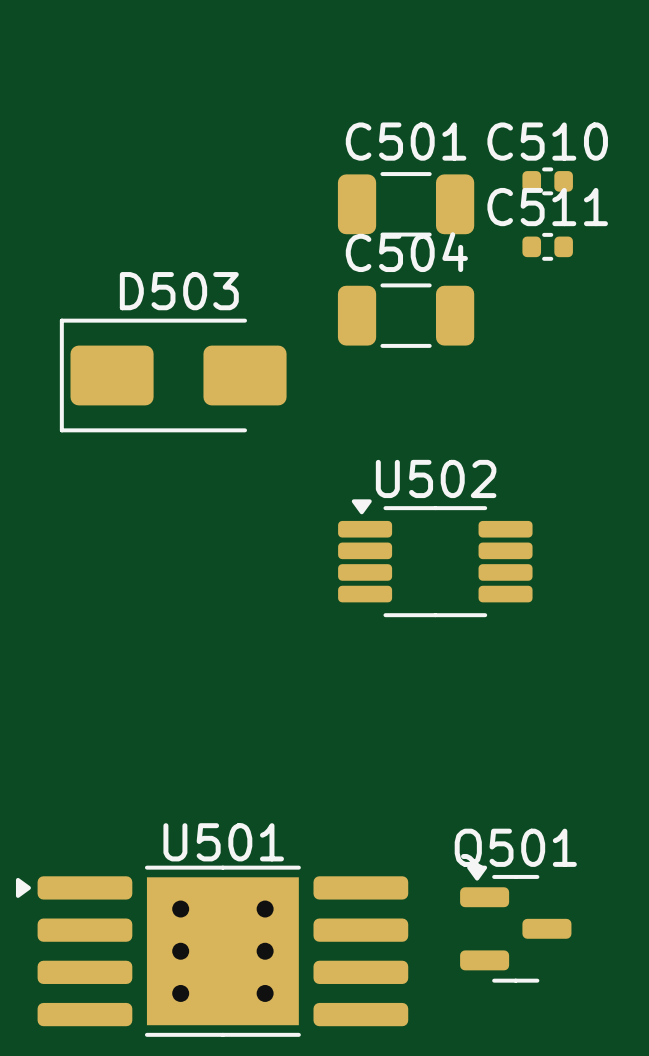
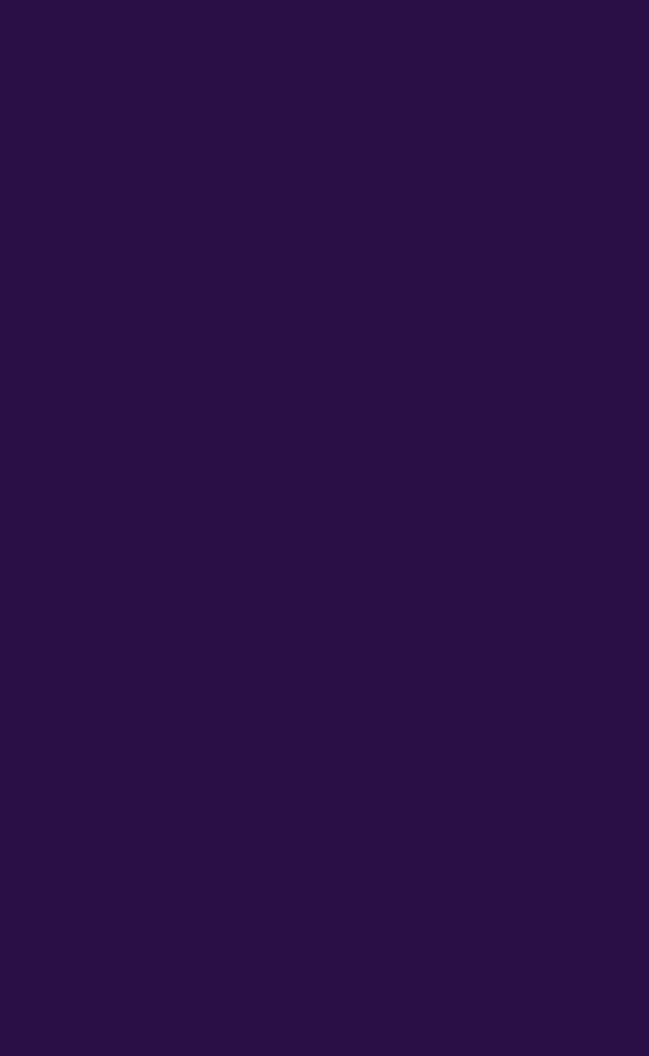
C510: (547, 181) -> none
C501: (406, 204) -> none
C511: (547, 246) -> none
C504: (406, 315) -> none
D503: (173, 375) -> none
U502: (435, 558) -> none
Q501: (515, 924) -> none
U501: (212, 951) -> none

